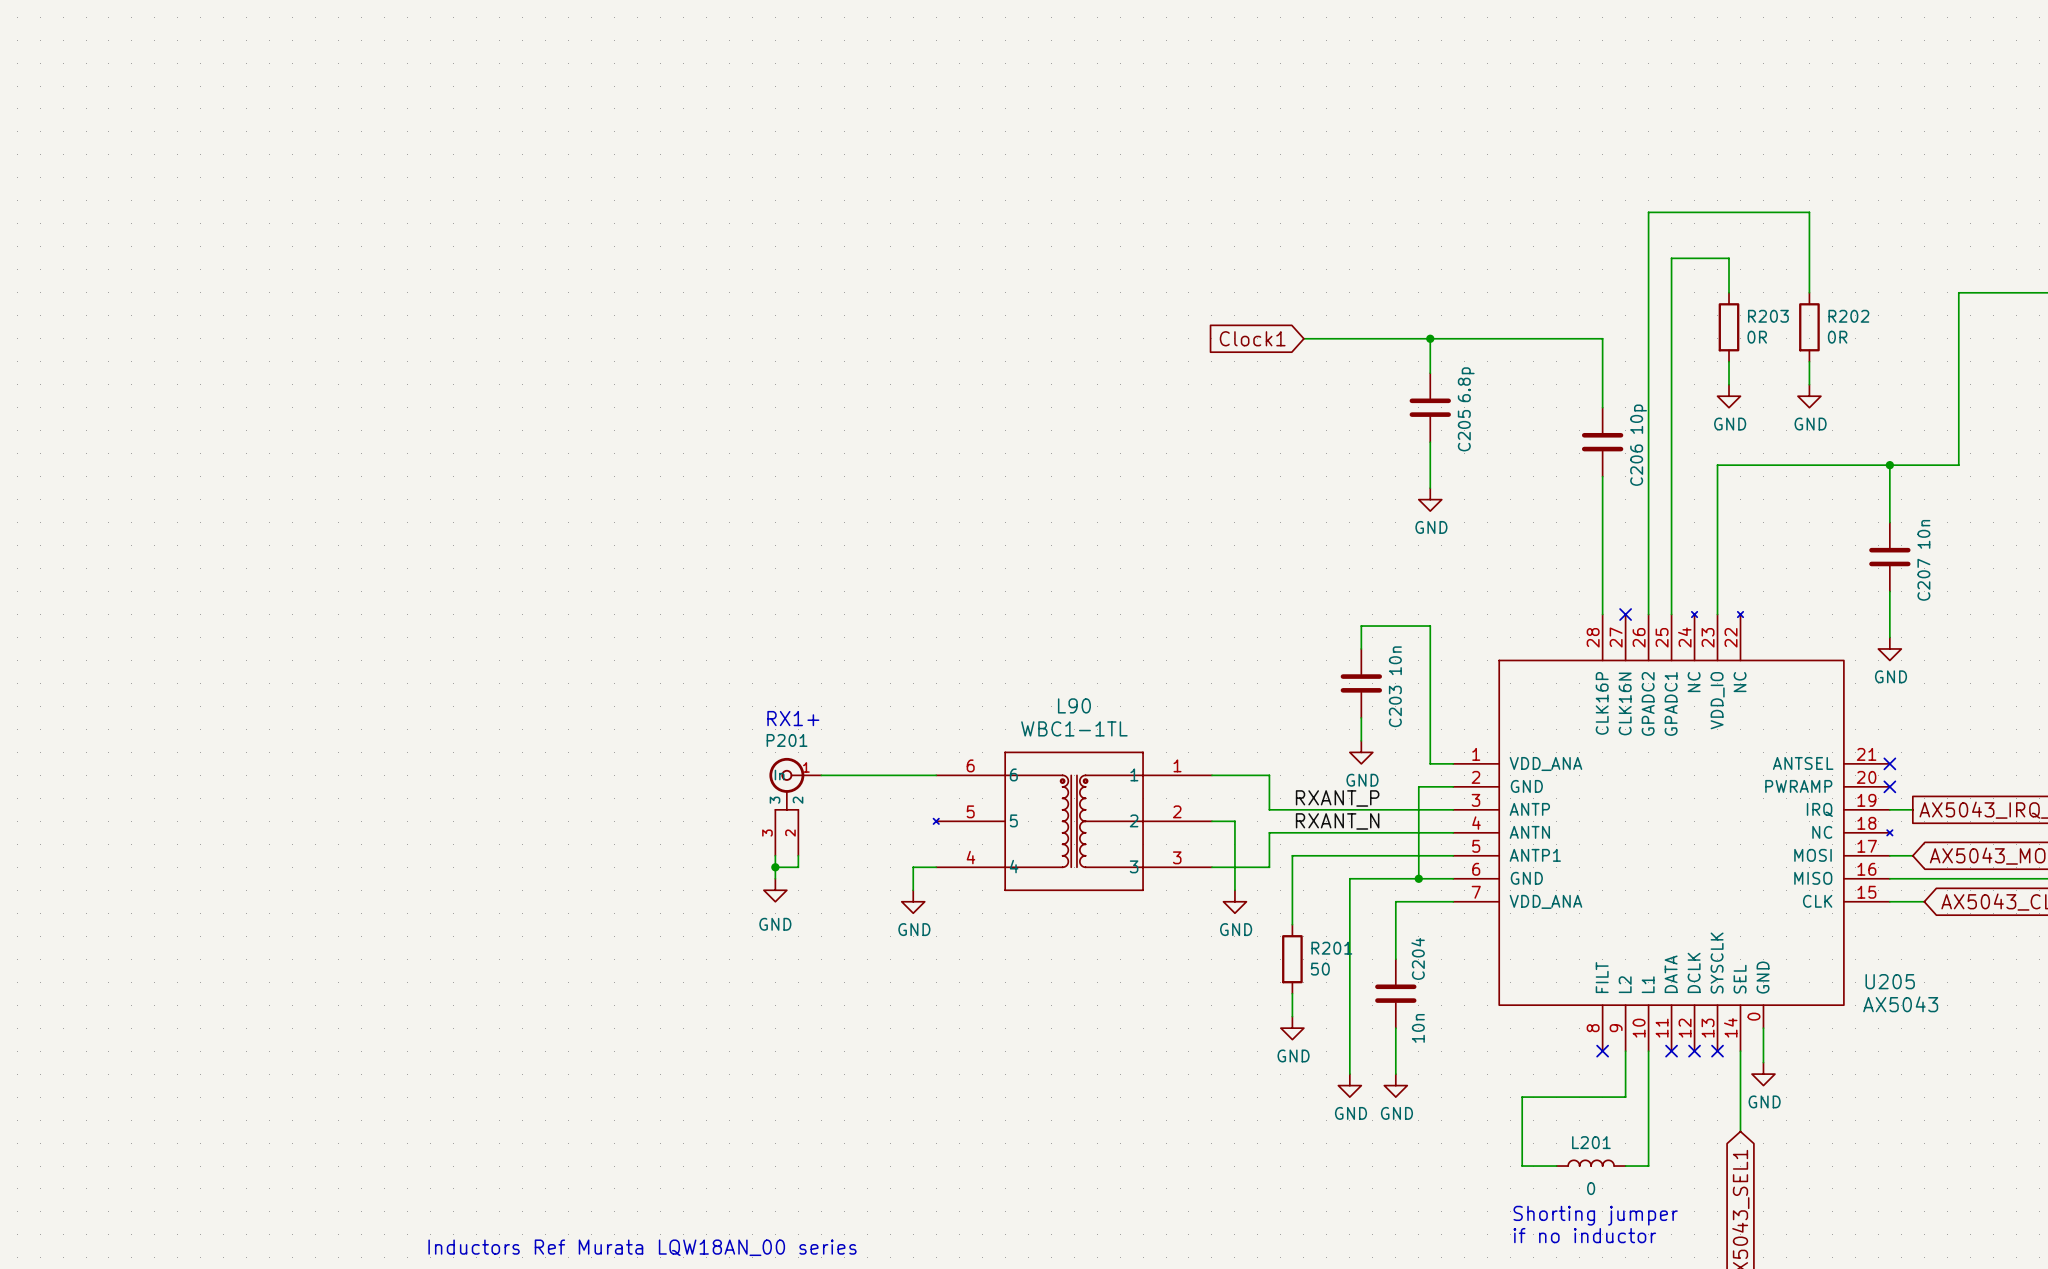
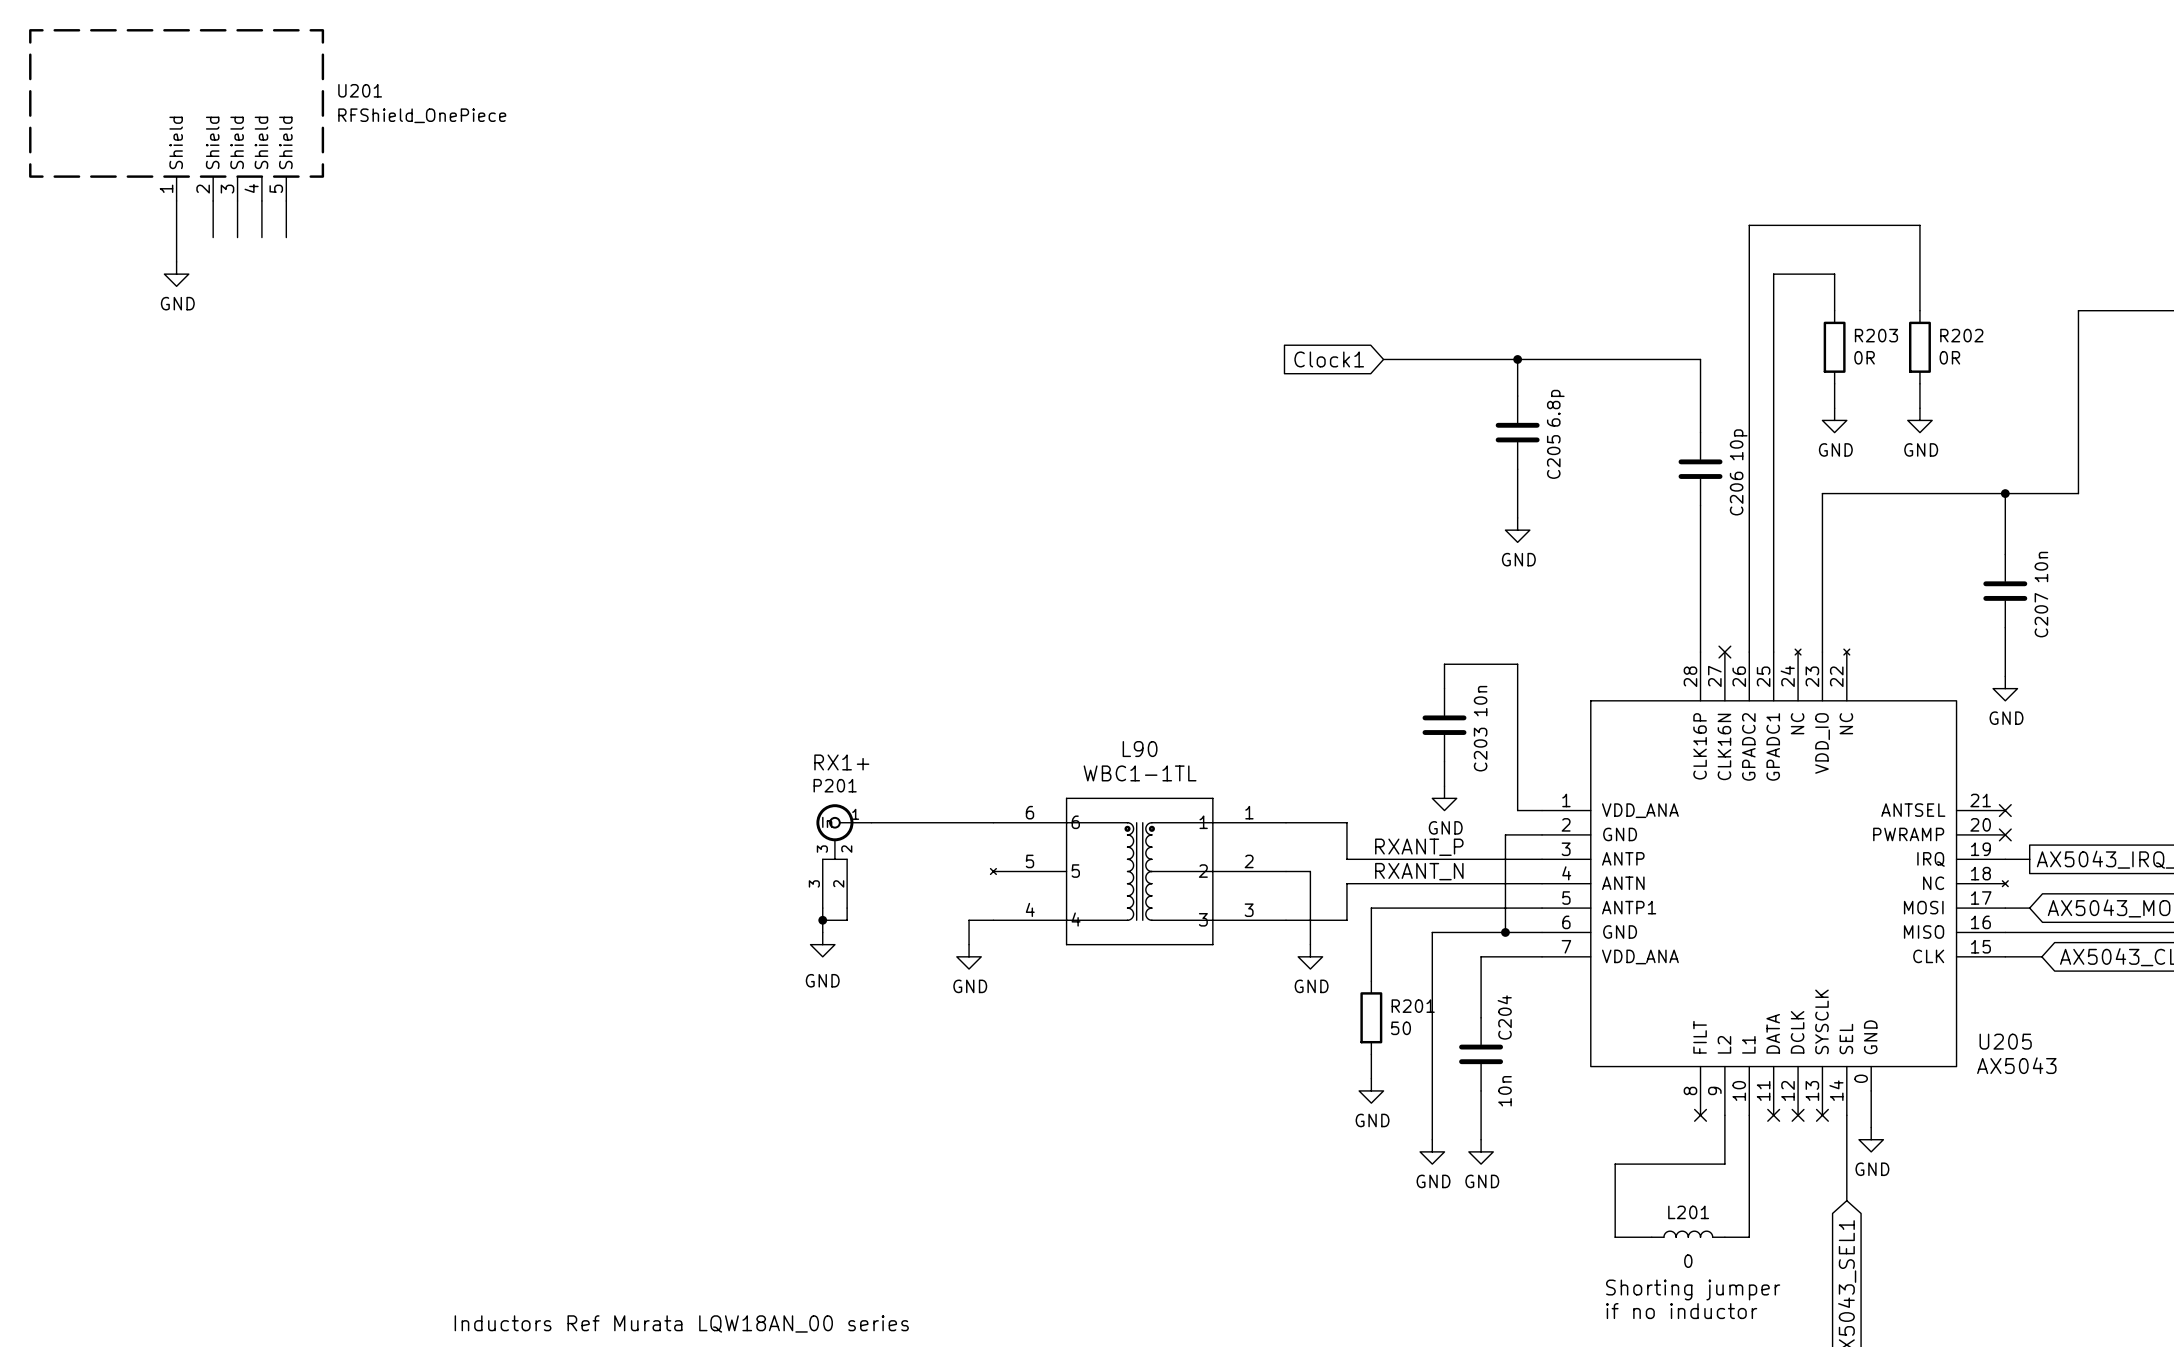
U201: none -> RFShield_OnePiece (176, 115)
wire: none -> (176, 200) (176, 261)
wire: none -> (213, 200) (213, 237)
wire: none -> (237, 200) (237, 237)
wire: none -> (261, 200) (261, 237)
wire: none -> (286, 200) (286, 237)
power symbol: none -> GND (176, 274)

